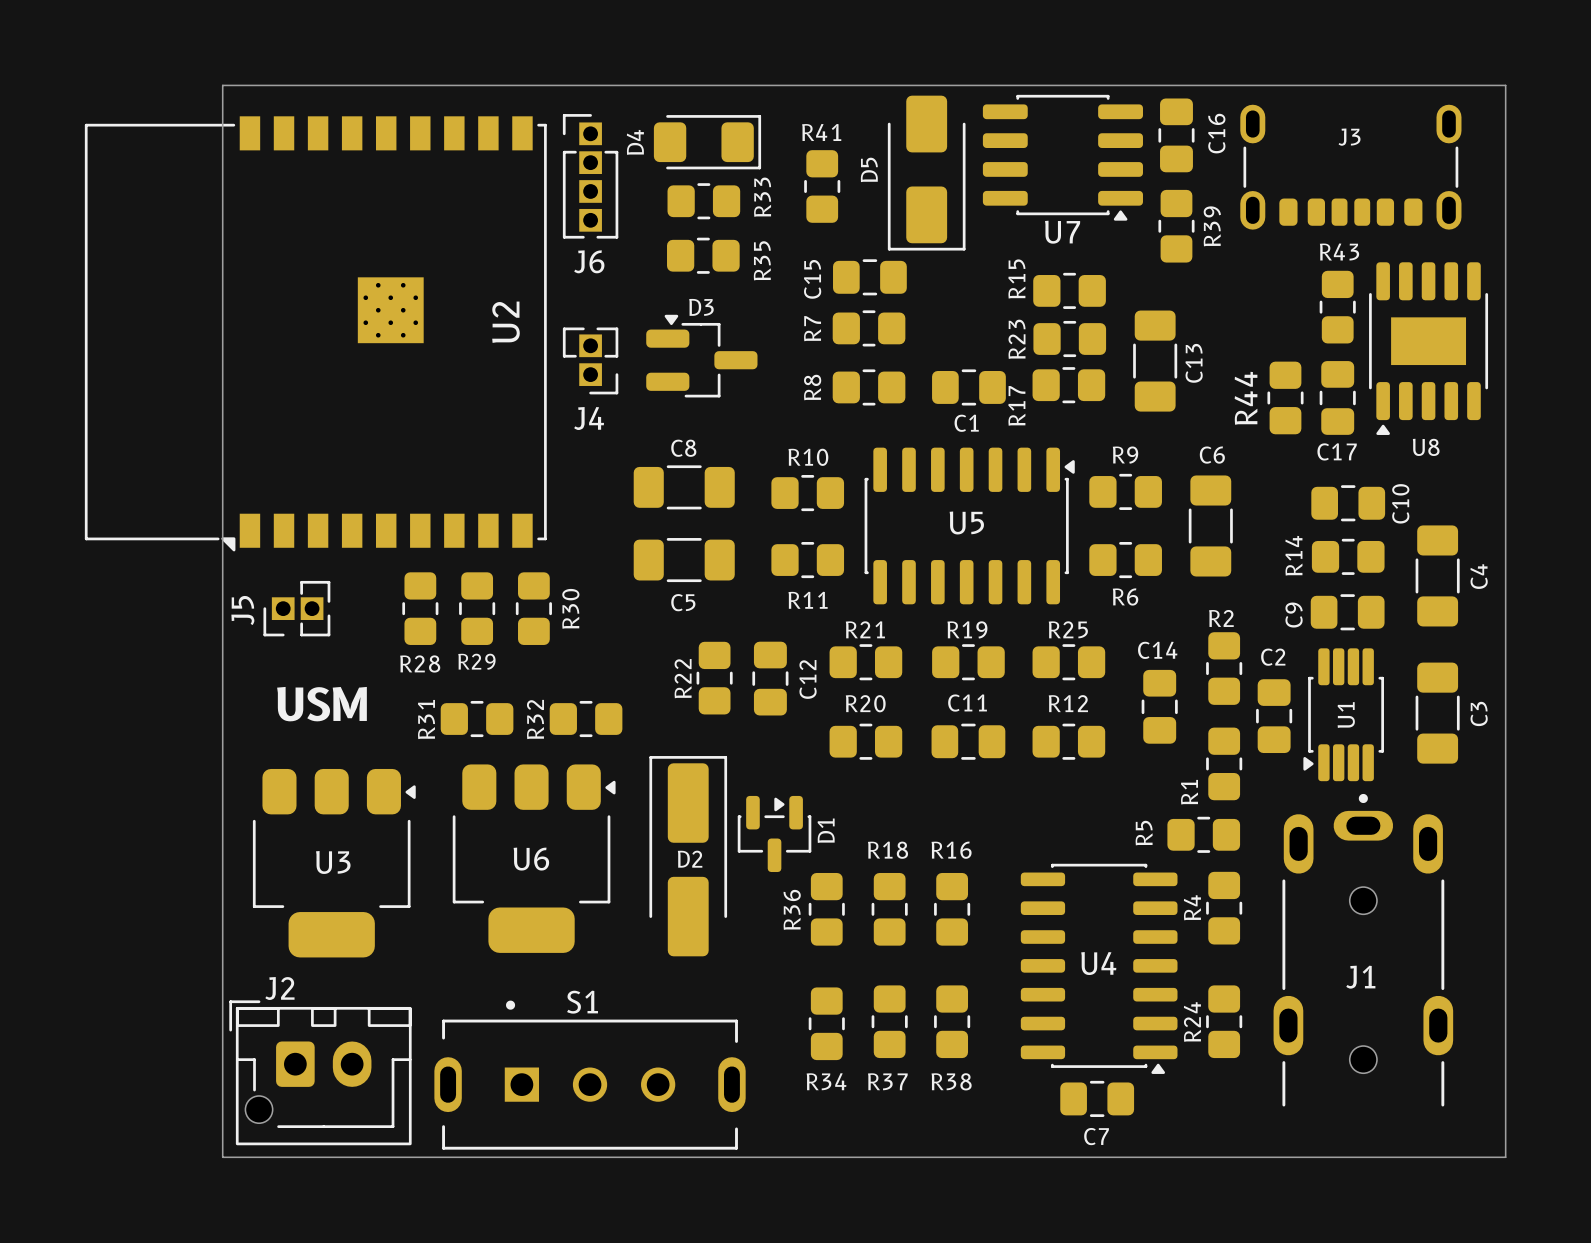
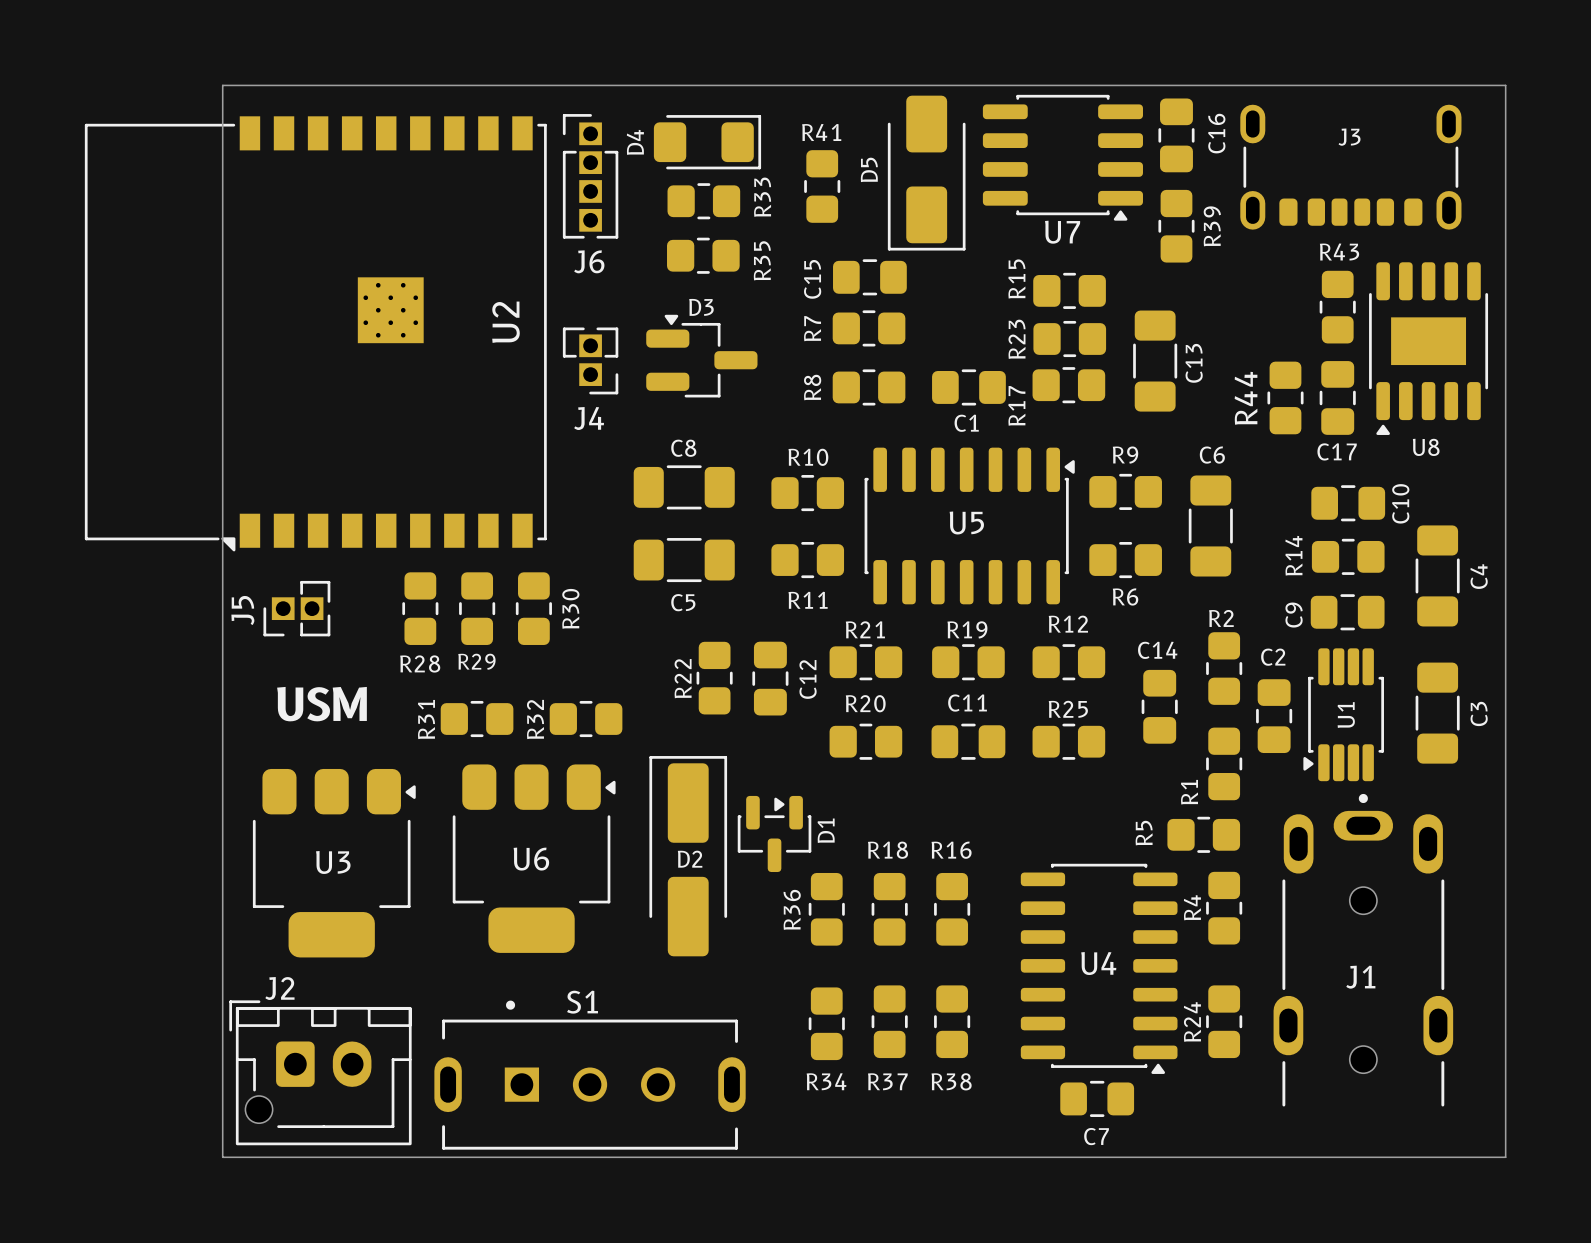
R25 name: R25 (1068, 629) -> R12 (1068, 624)
R12 name: R12 (1068, 703) -> R25 (1068, 709)

